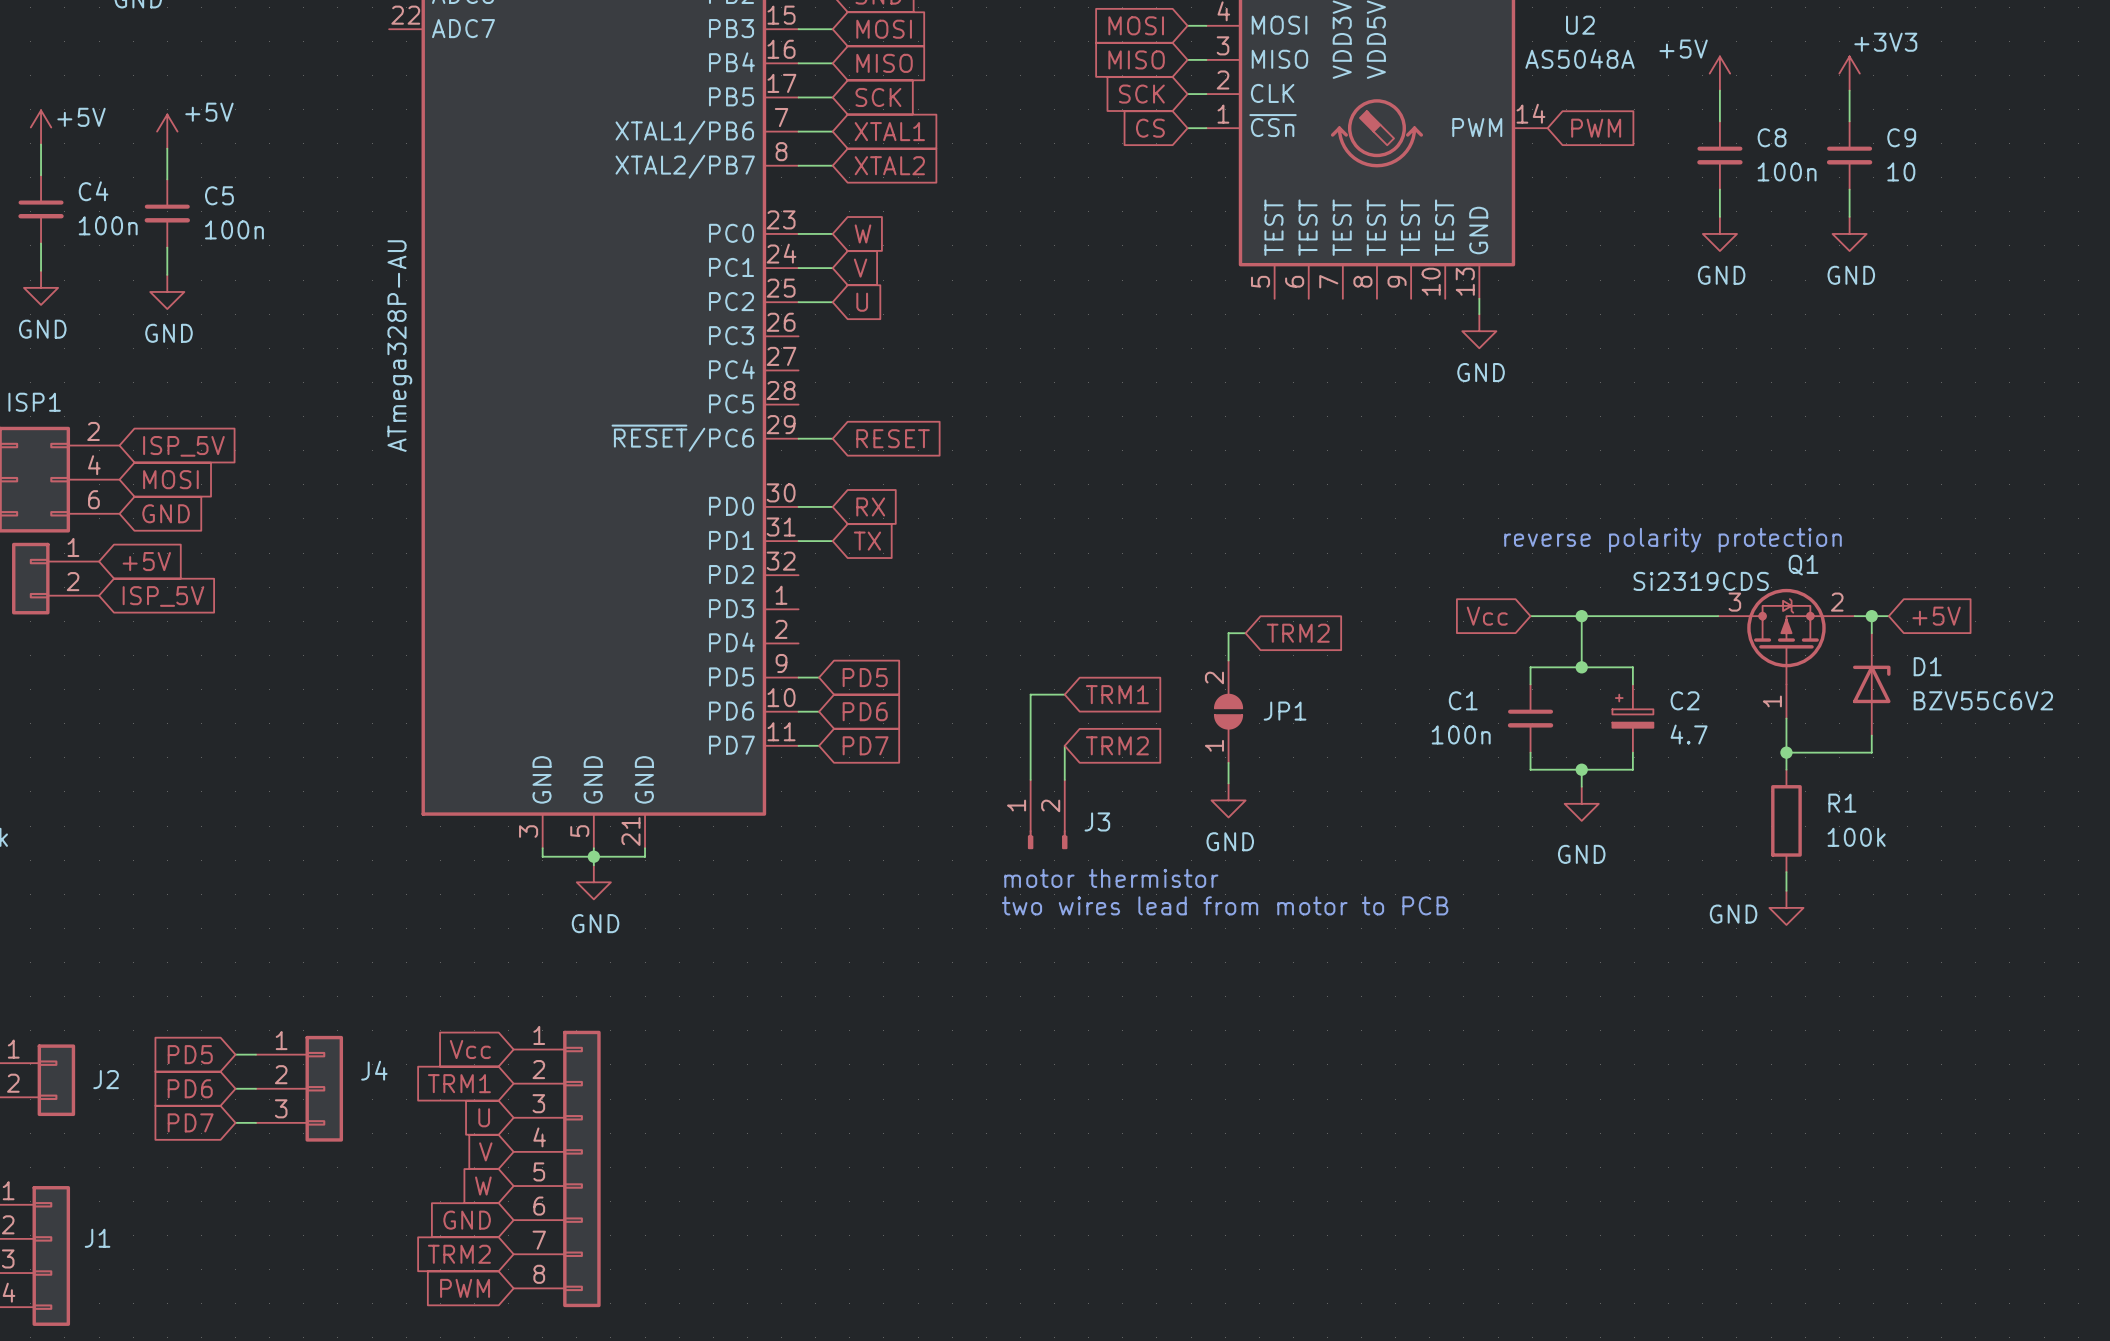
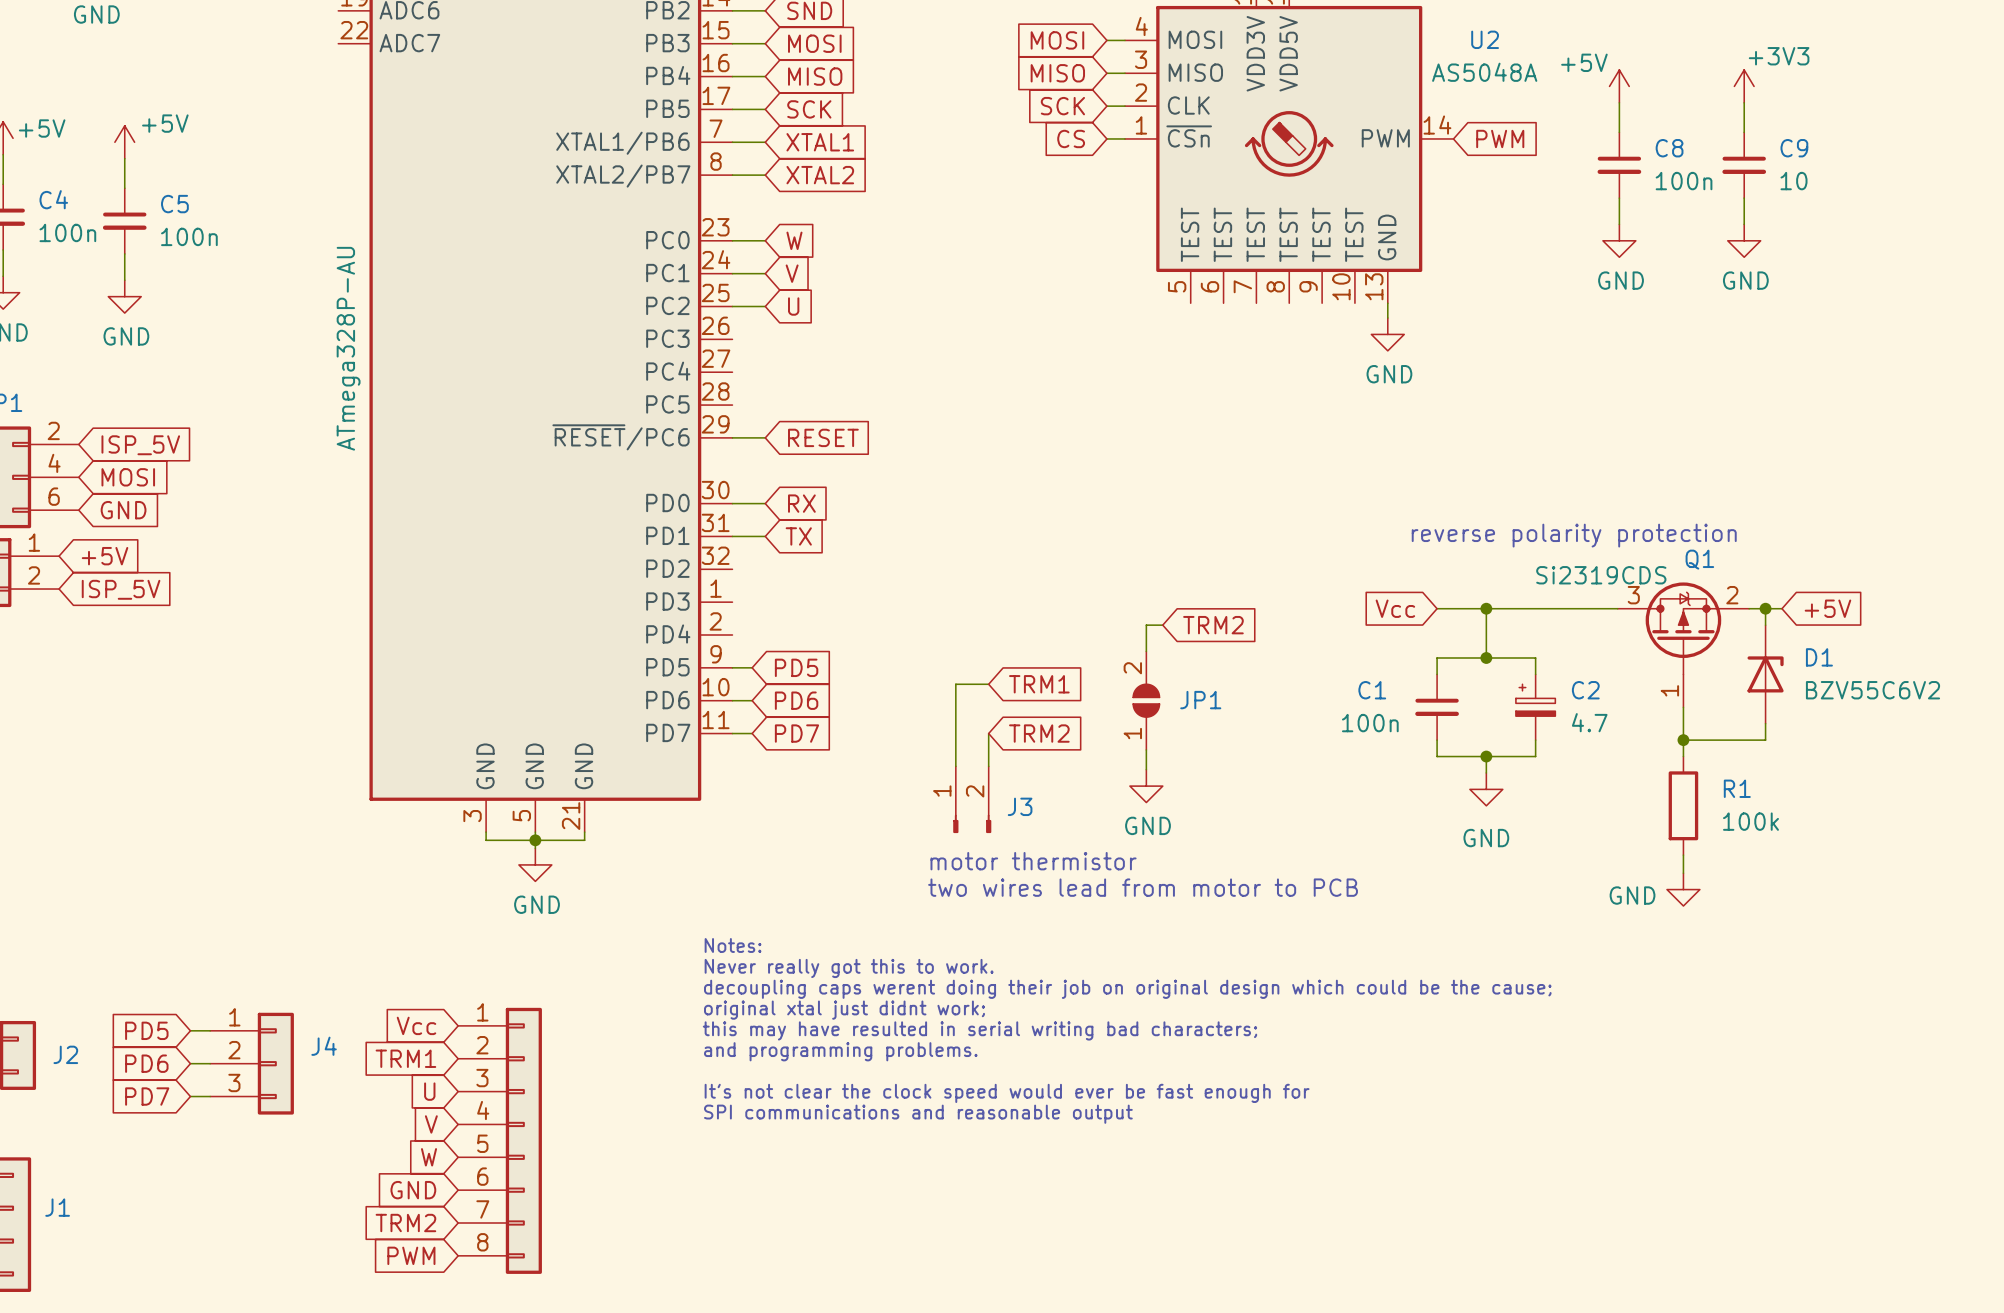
text: none -> Notes: (733, 945)
text: none -> Never really got this to work. (849, 968)
text: none -> decoupling caps werent doing their job on original design which could be the cause; (1127, 989)
text: none -> original xtal just didnt work; (844, 1010)
text: none -> this may have resulted in serial writing bad characters; (979, 1030)
text: none -> and programming problems. (840, 1051)
text: none -> It's not clear the clock speed would ever be fast enough for (1007, 1093)
text: none -> SPI communications and reasonable output (918, 1114)

